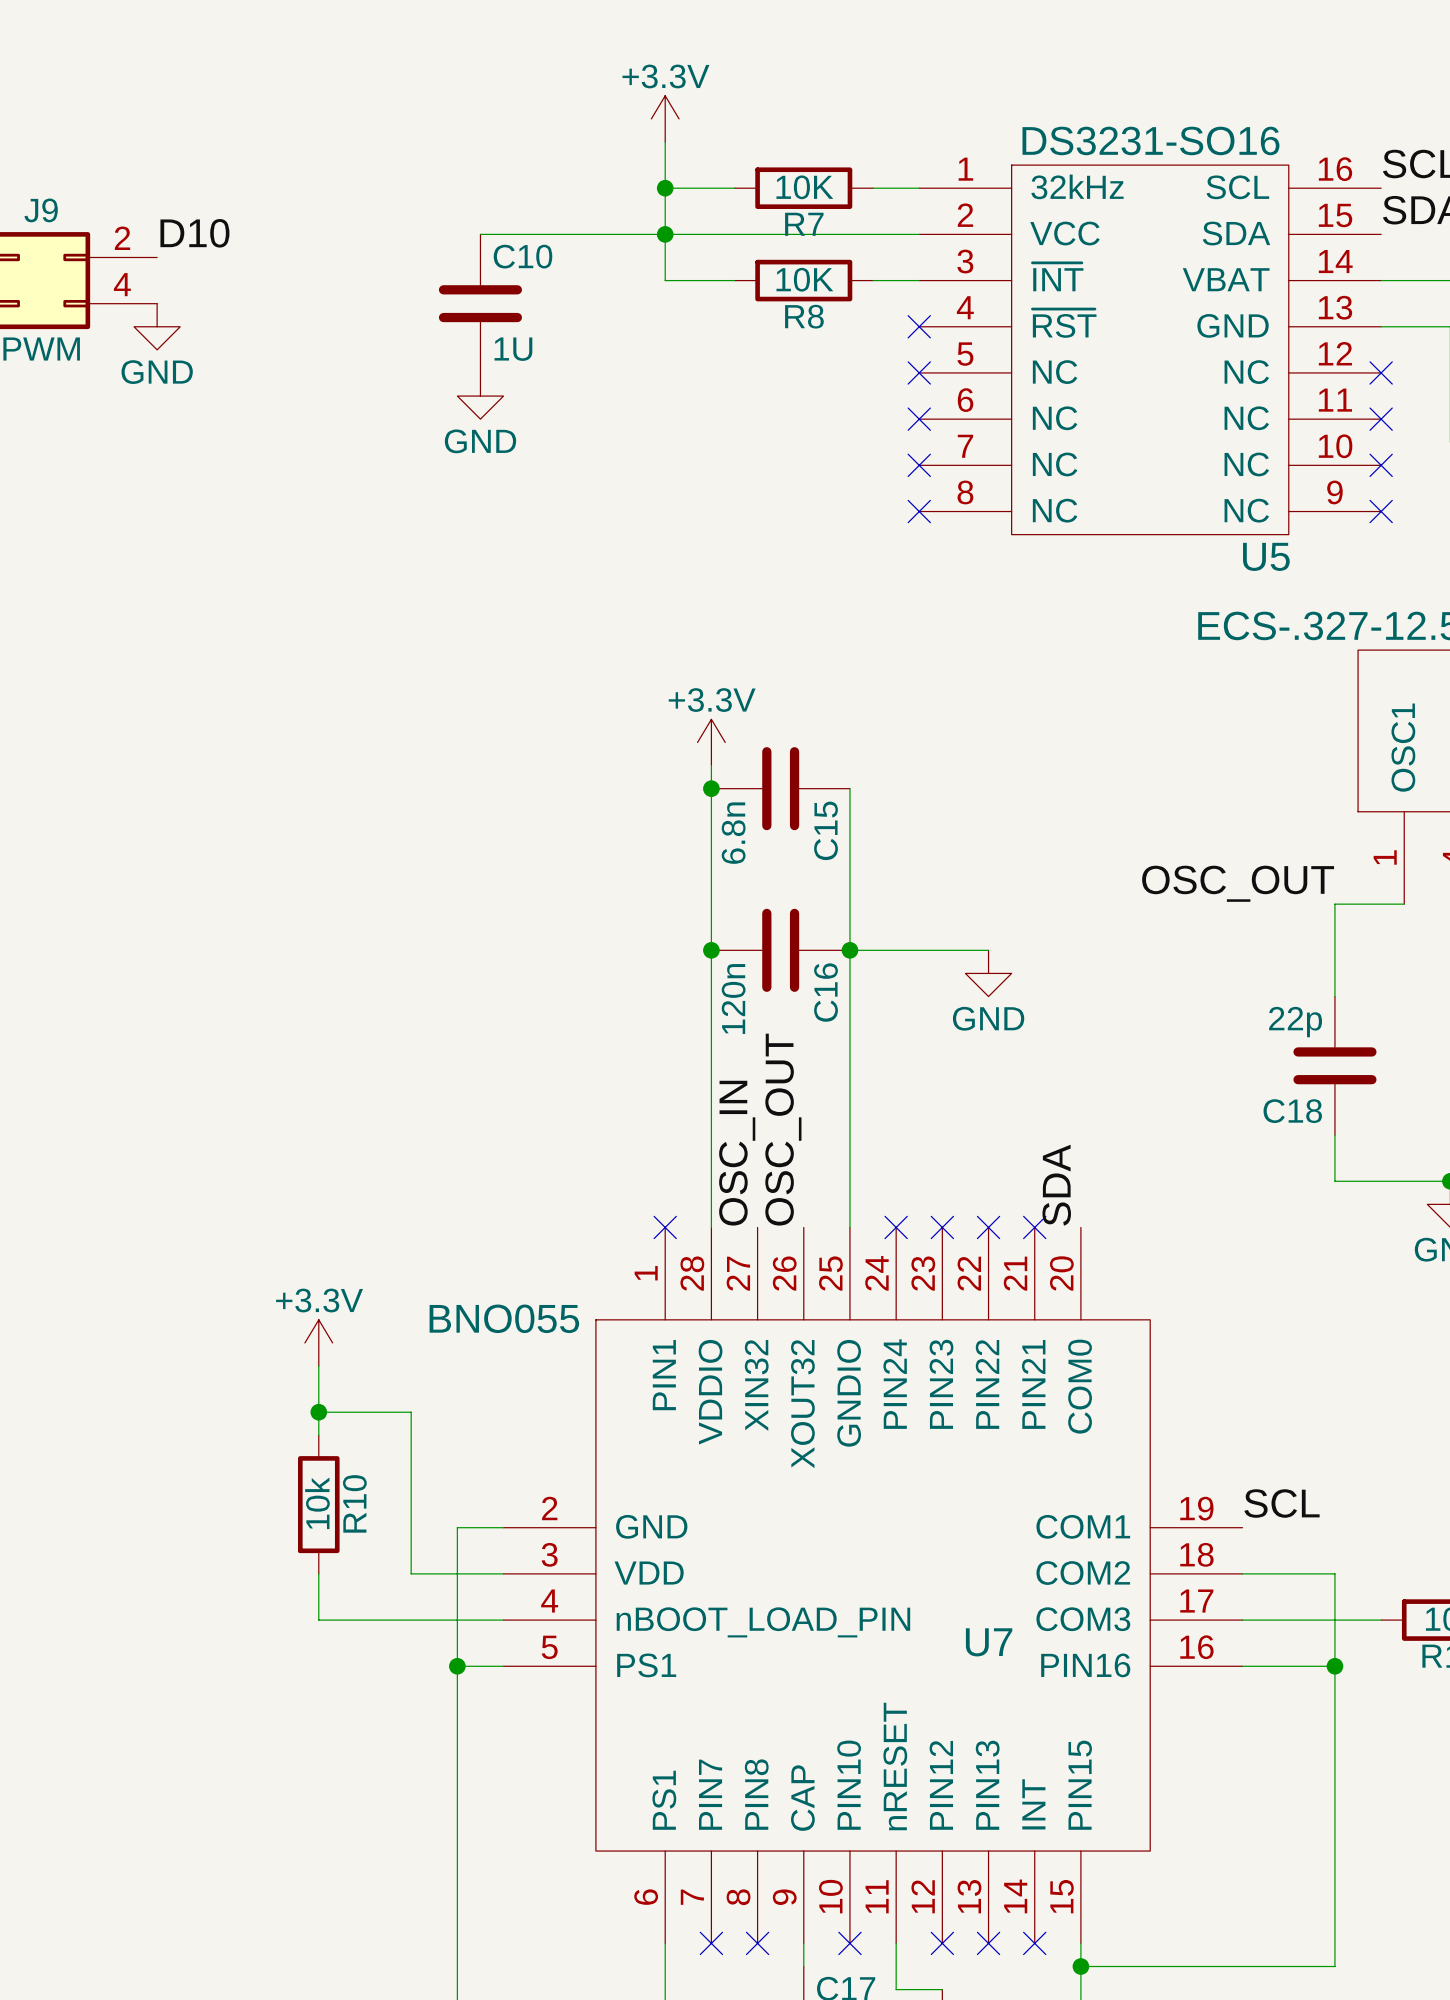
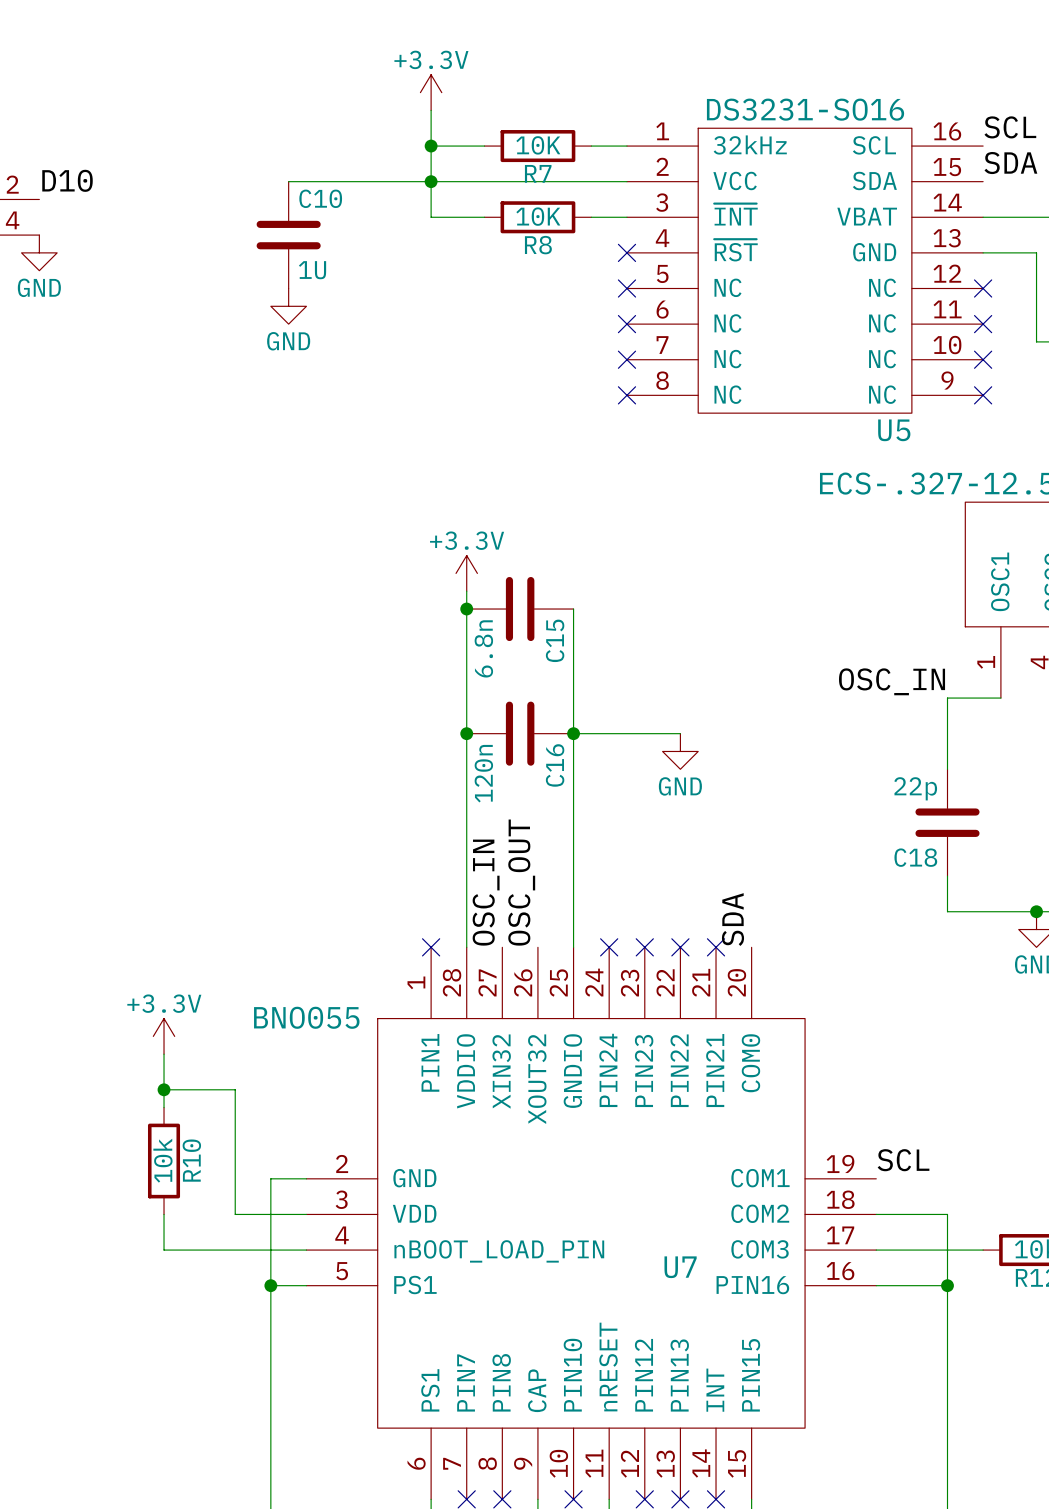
label: OSC_OUT (1238, 883) -> OSC_IN (892, 681)

